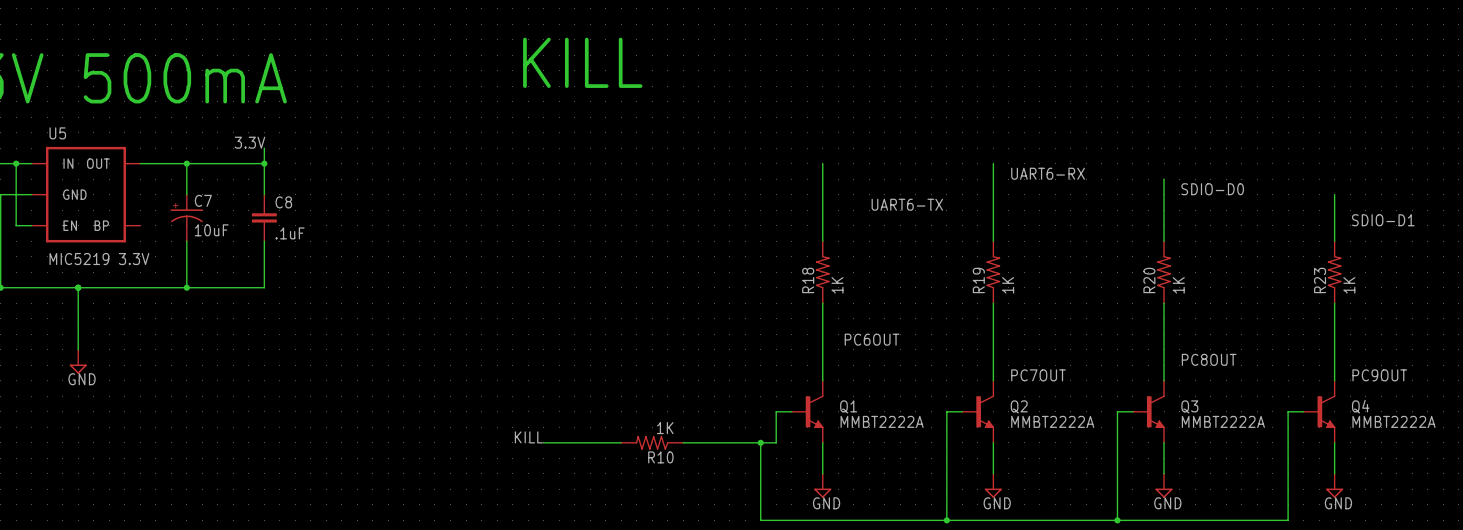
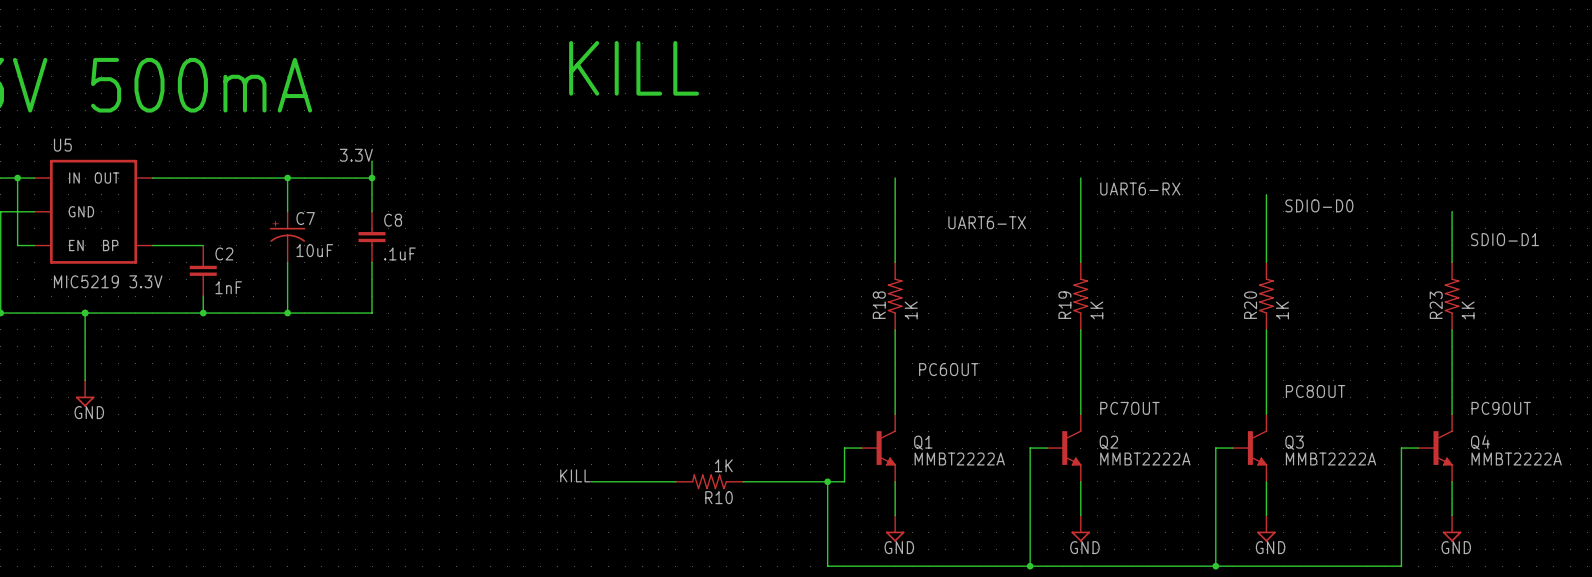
label position: 3.3V (249, 142) -> 3.3V (356, 155)
wire: (264, 148) (264, 163) -> (372, 178) (287, 178)
wire: none -> (372, 161) (372, 211)
wire: (186, 163) (186, 194) -> none
junction: (186, 163) -> none
junction: none -> (372, 178)
C7 position: (186, 217) -> (287, 237)
C8 position: (264, 217) -> (372, 237)
wire: none -> (152, 245) (203, 245)
wire: none -> (372, 262) (372, 313) (287, 313)
C2: none -> 1nF (203, 270)
junction: none -> (287, 313)

